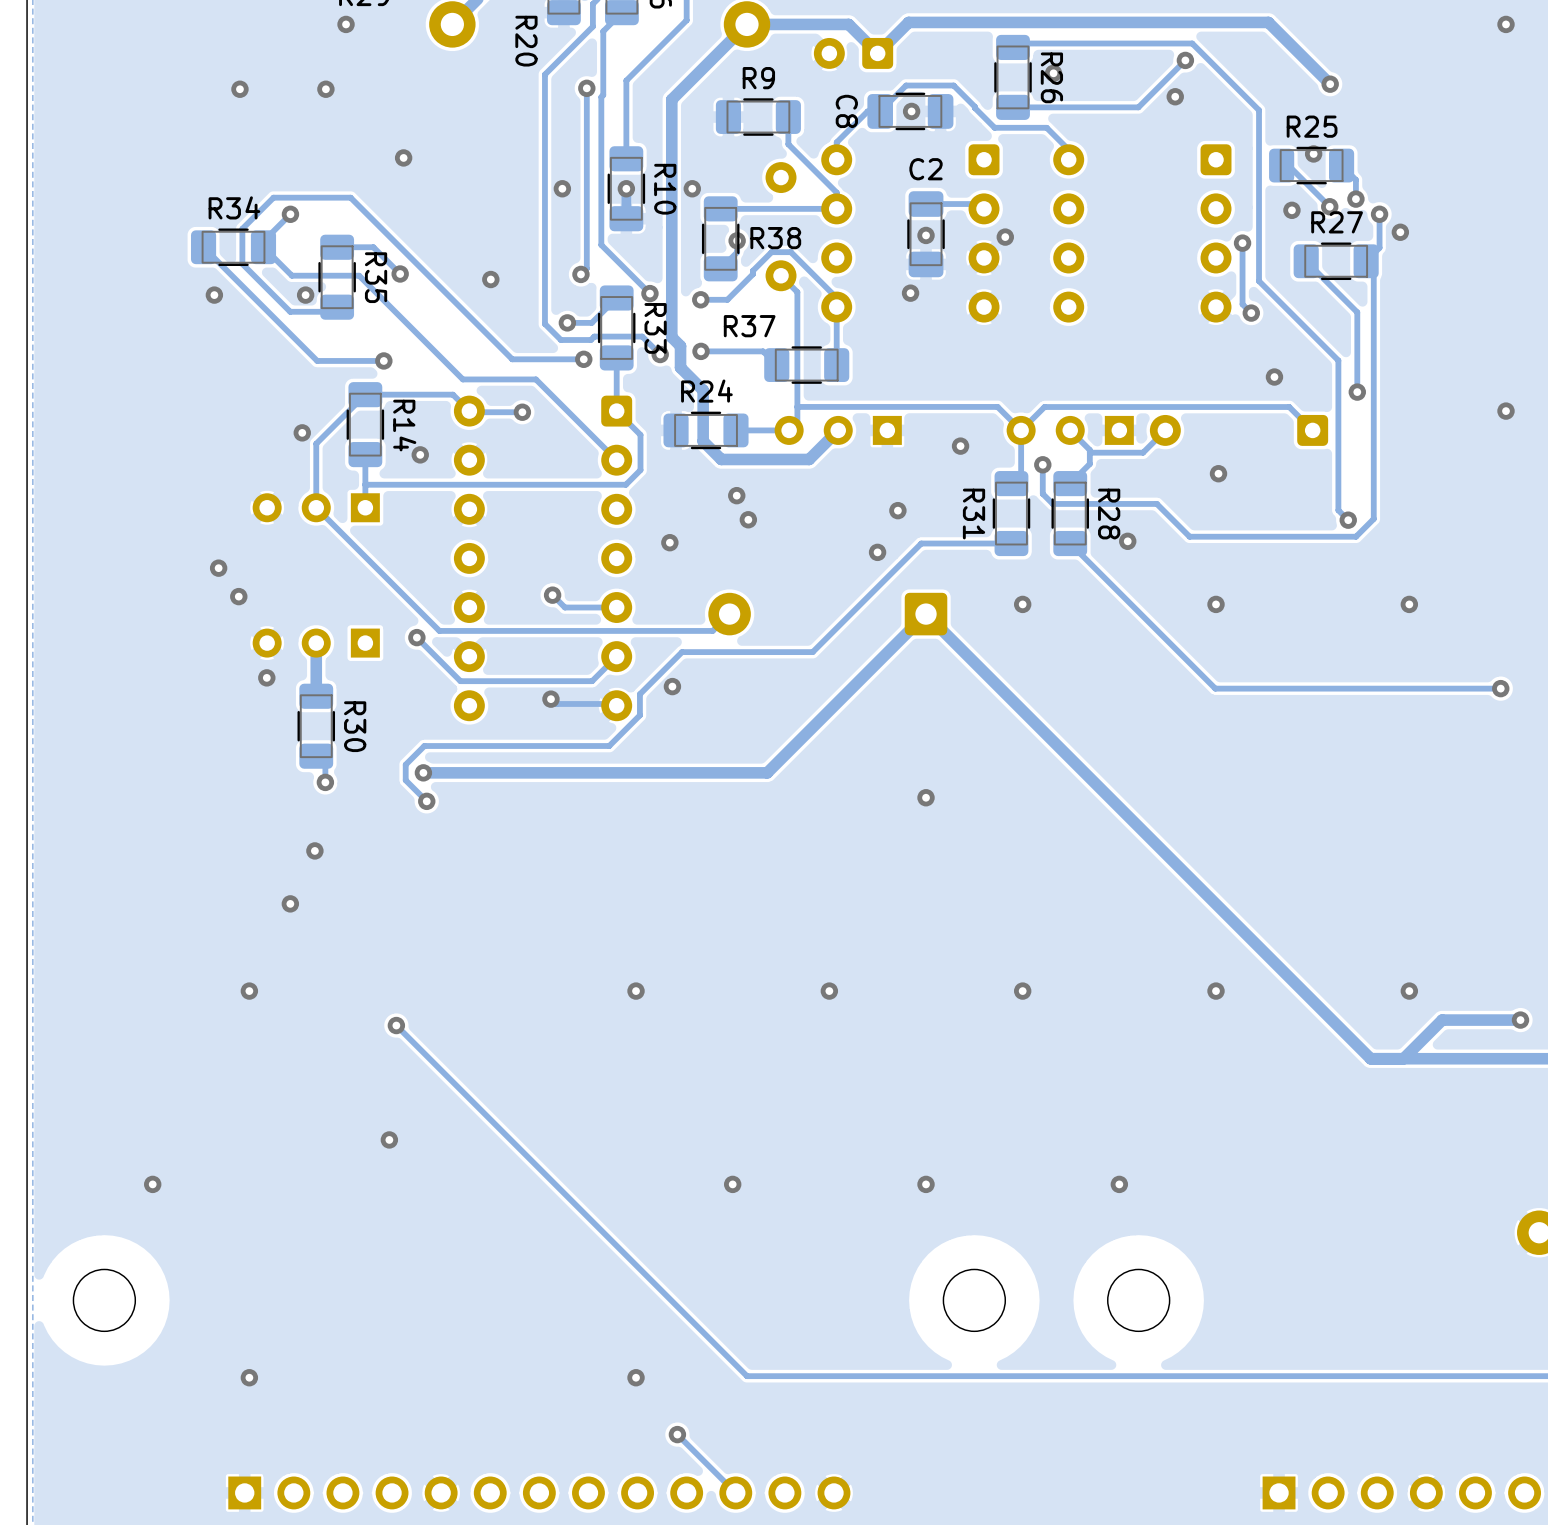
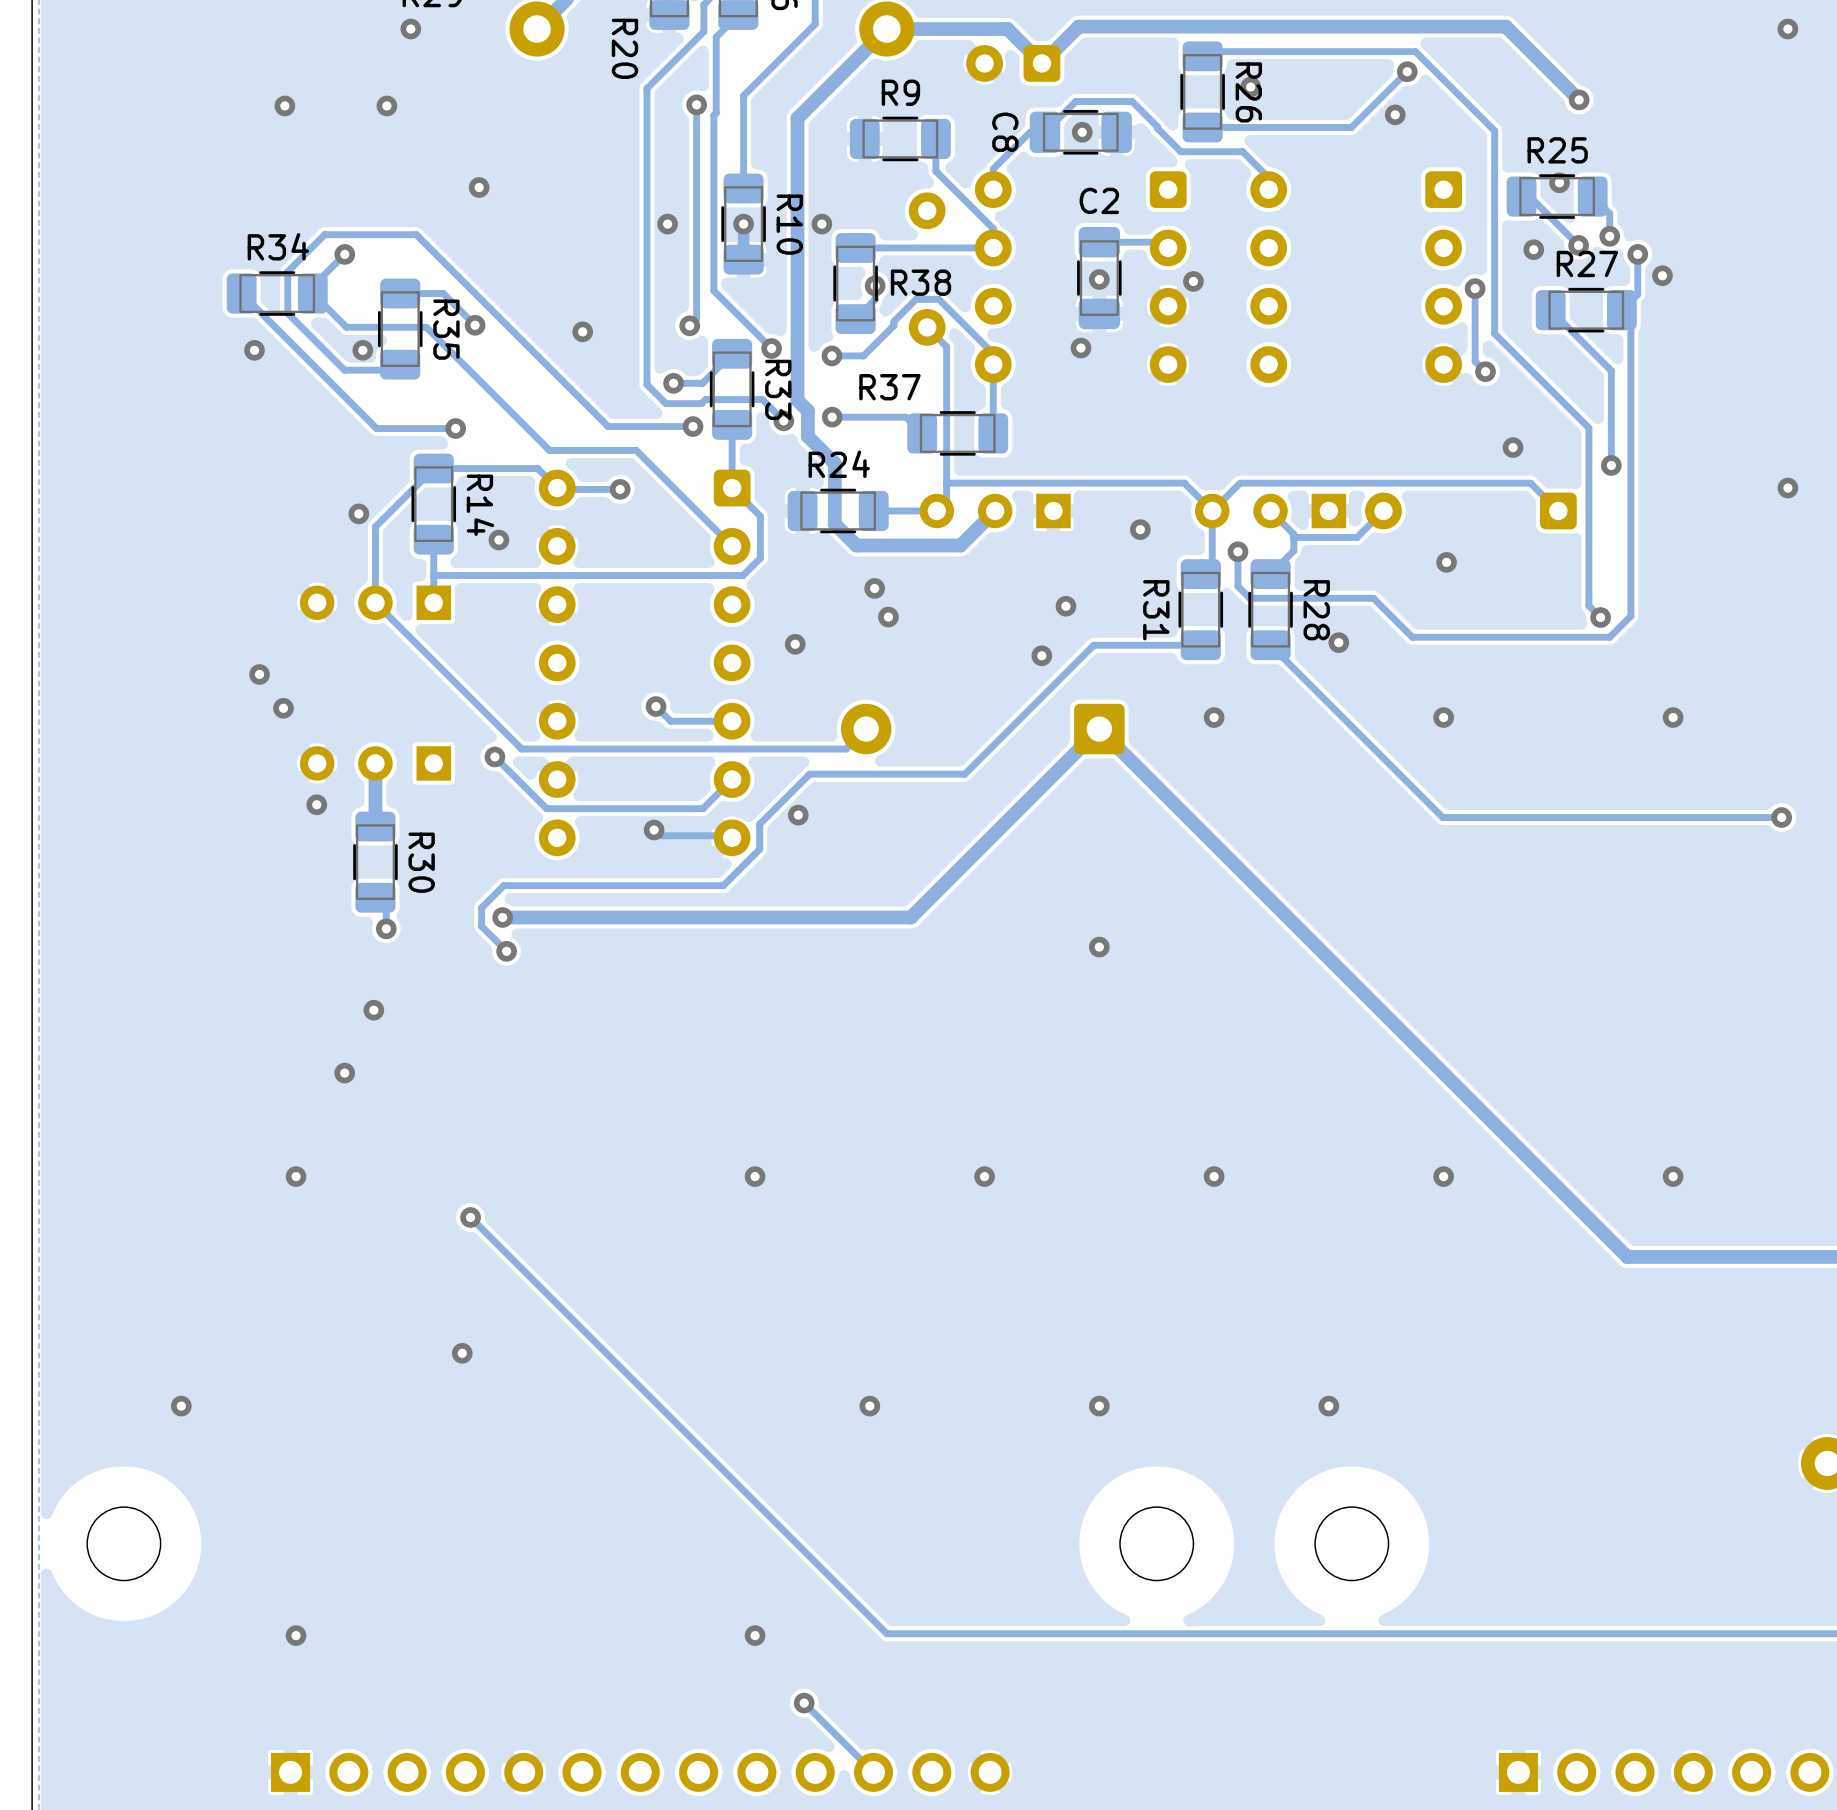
track: (1520, 1020) (1442, 1020) (1403, 1058) -> none
via: (1520, 1020) -> none

